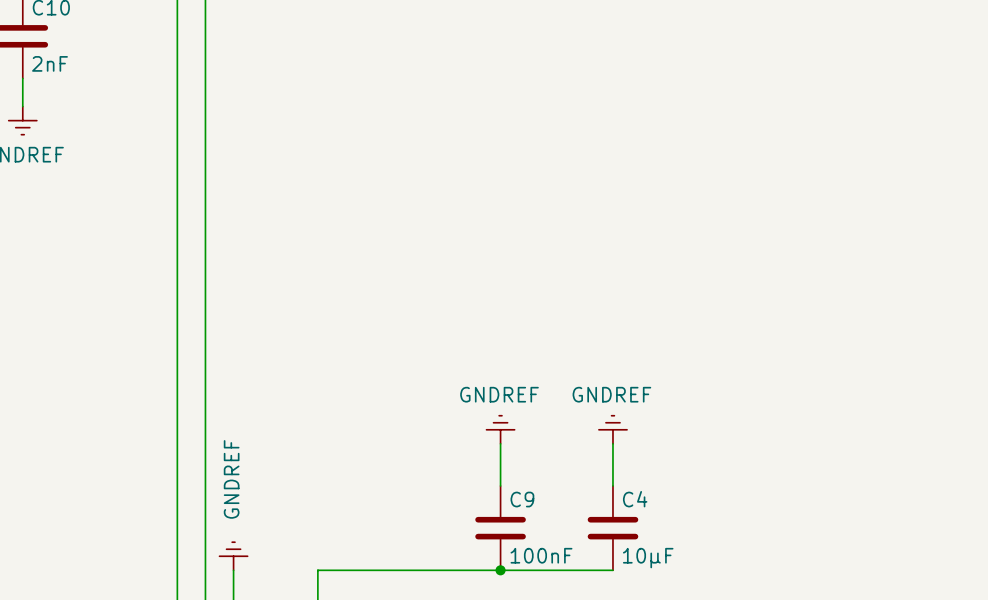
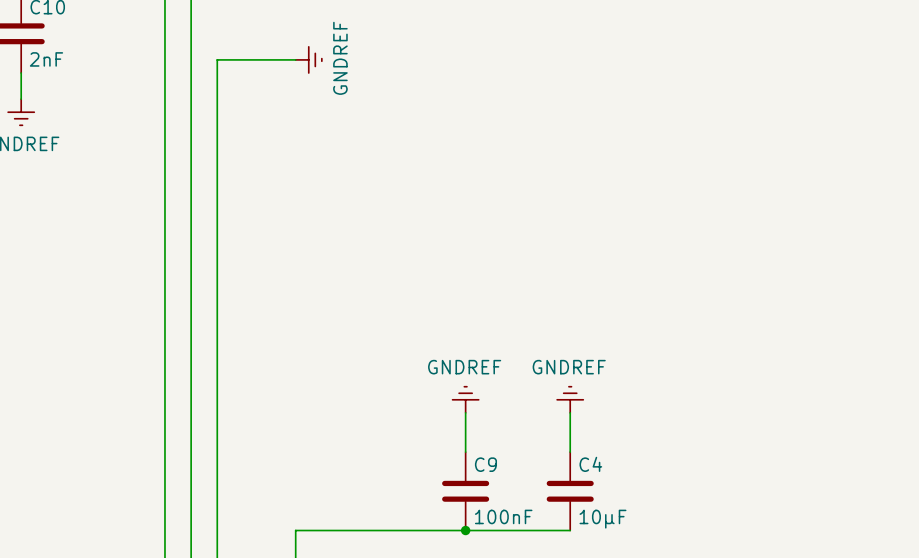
wire: none -> (295, 59) (217, 59) (217, 530)
power symbol: none -> GNDREF (308, 59)
power symbol: GNDREF (233, 556) -> none

